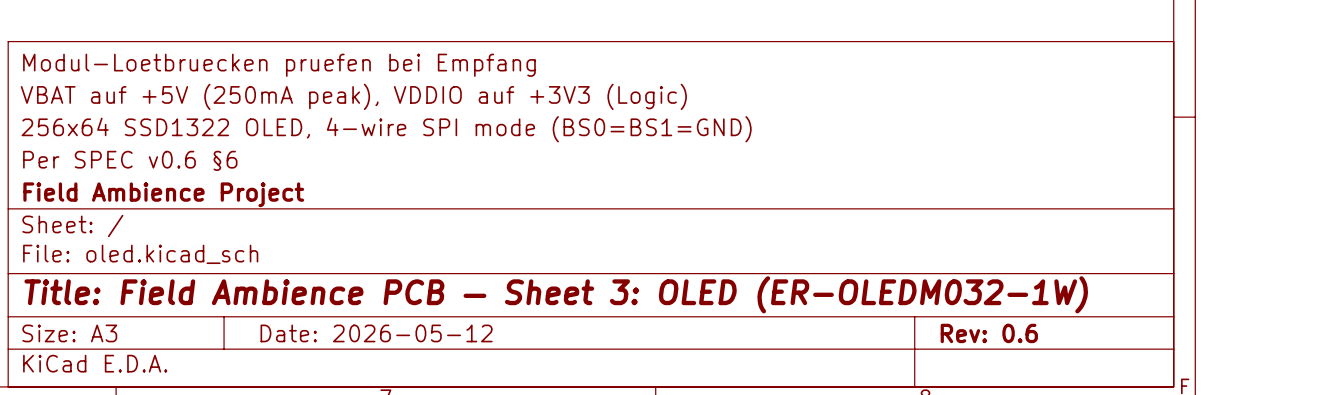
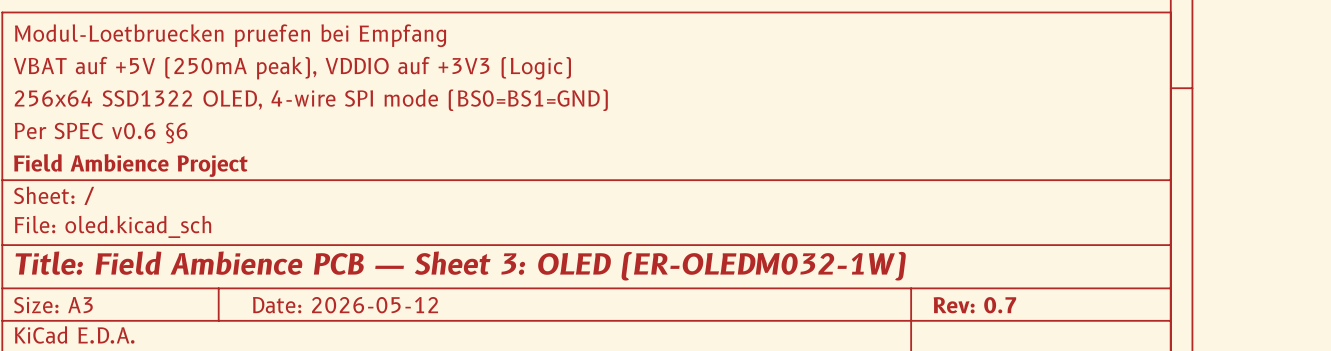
title block: Rev: 0.6 (989, 333) -> Rev: 0.7 (974, 305)

